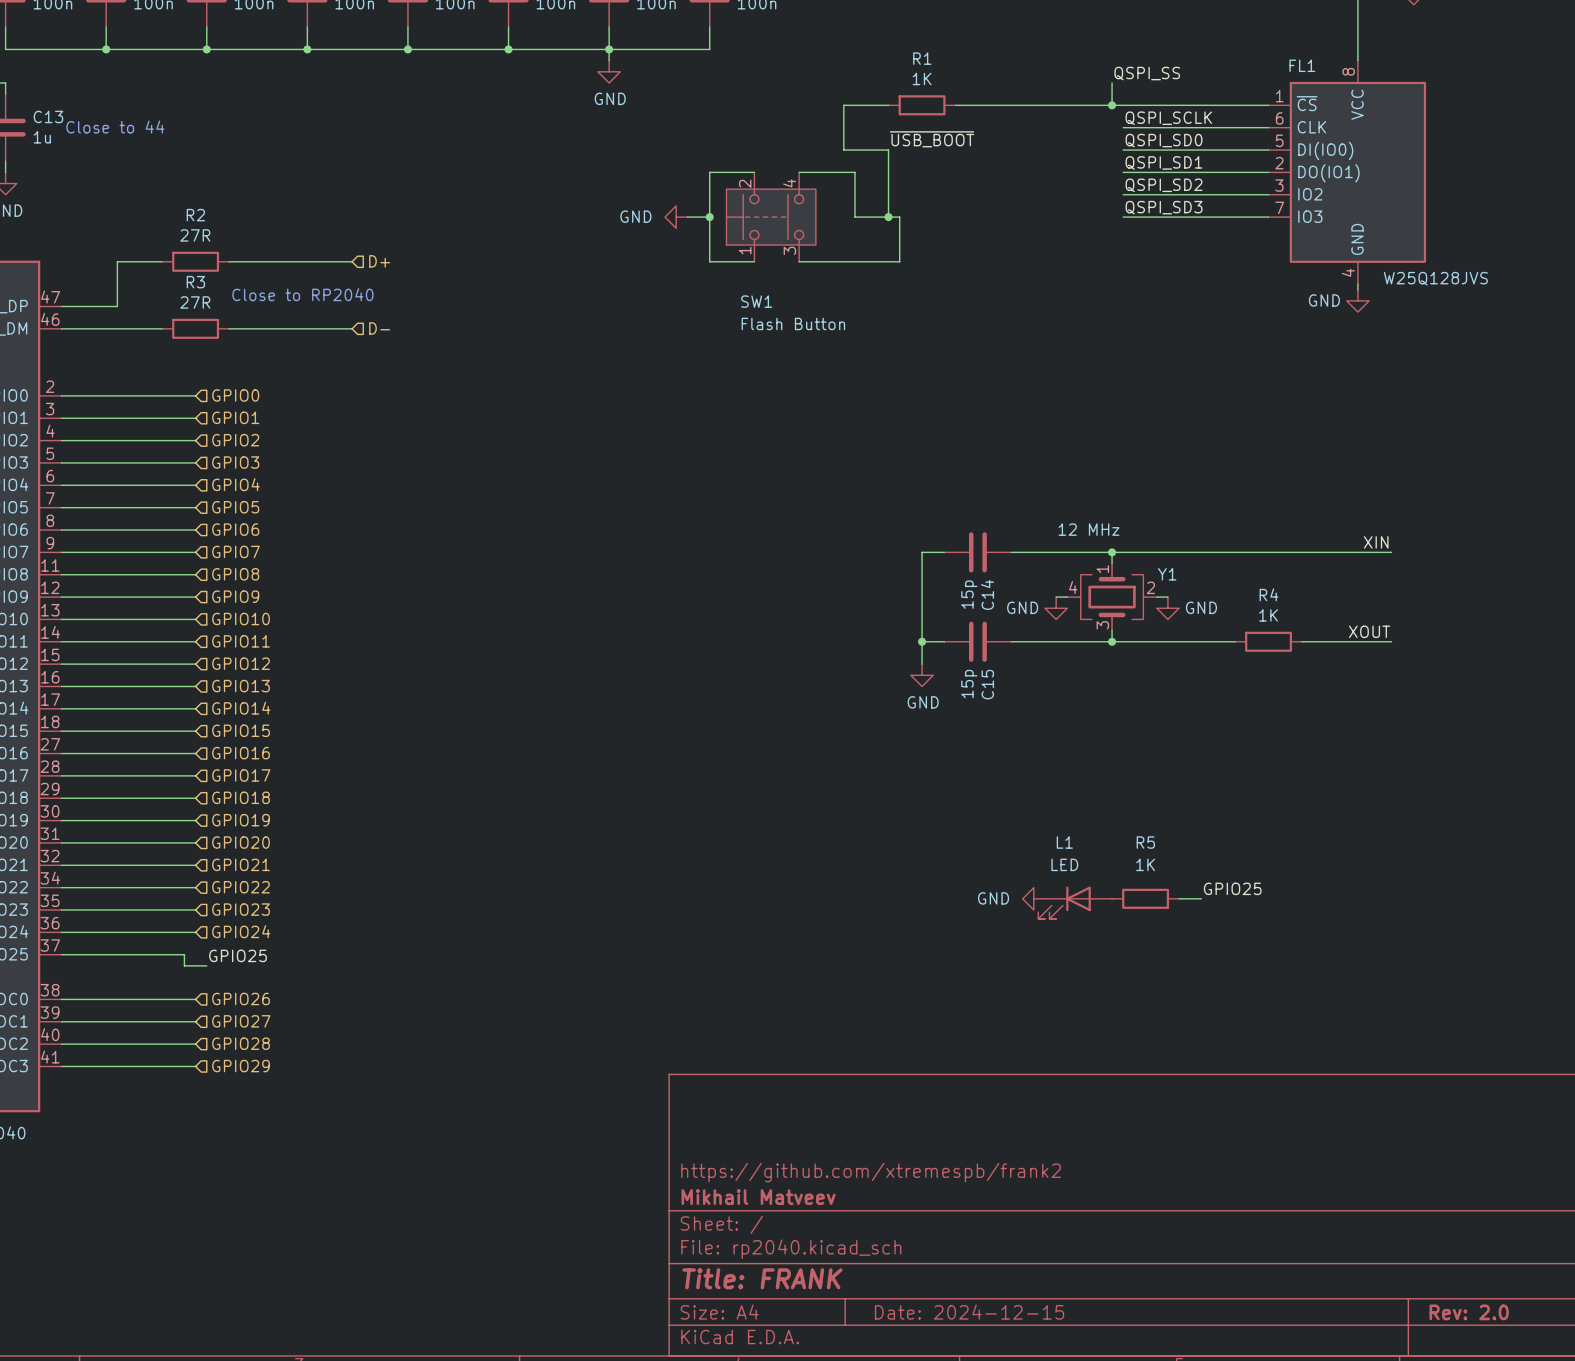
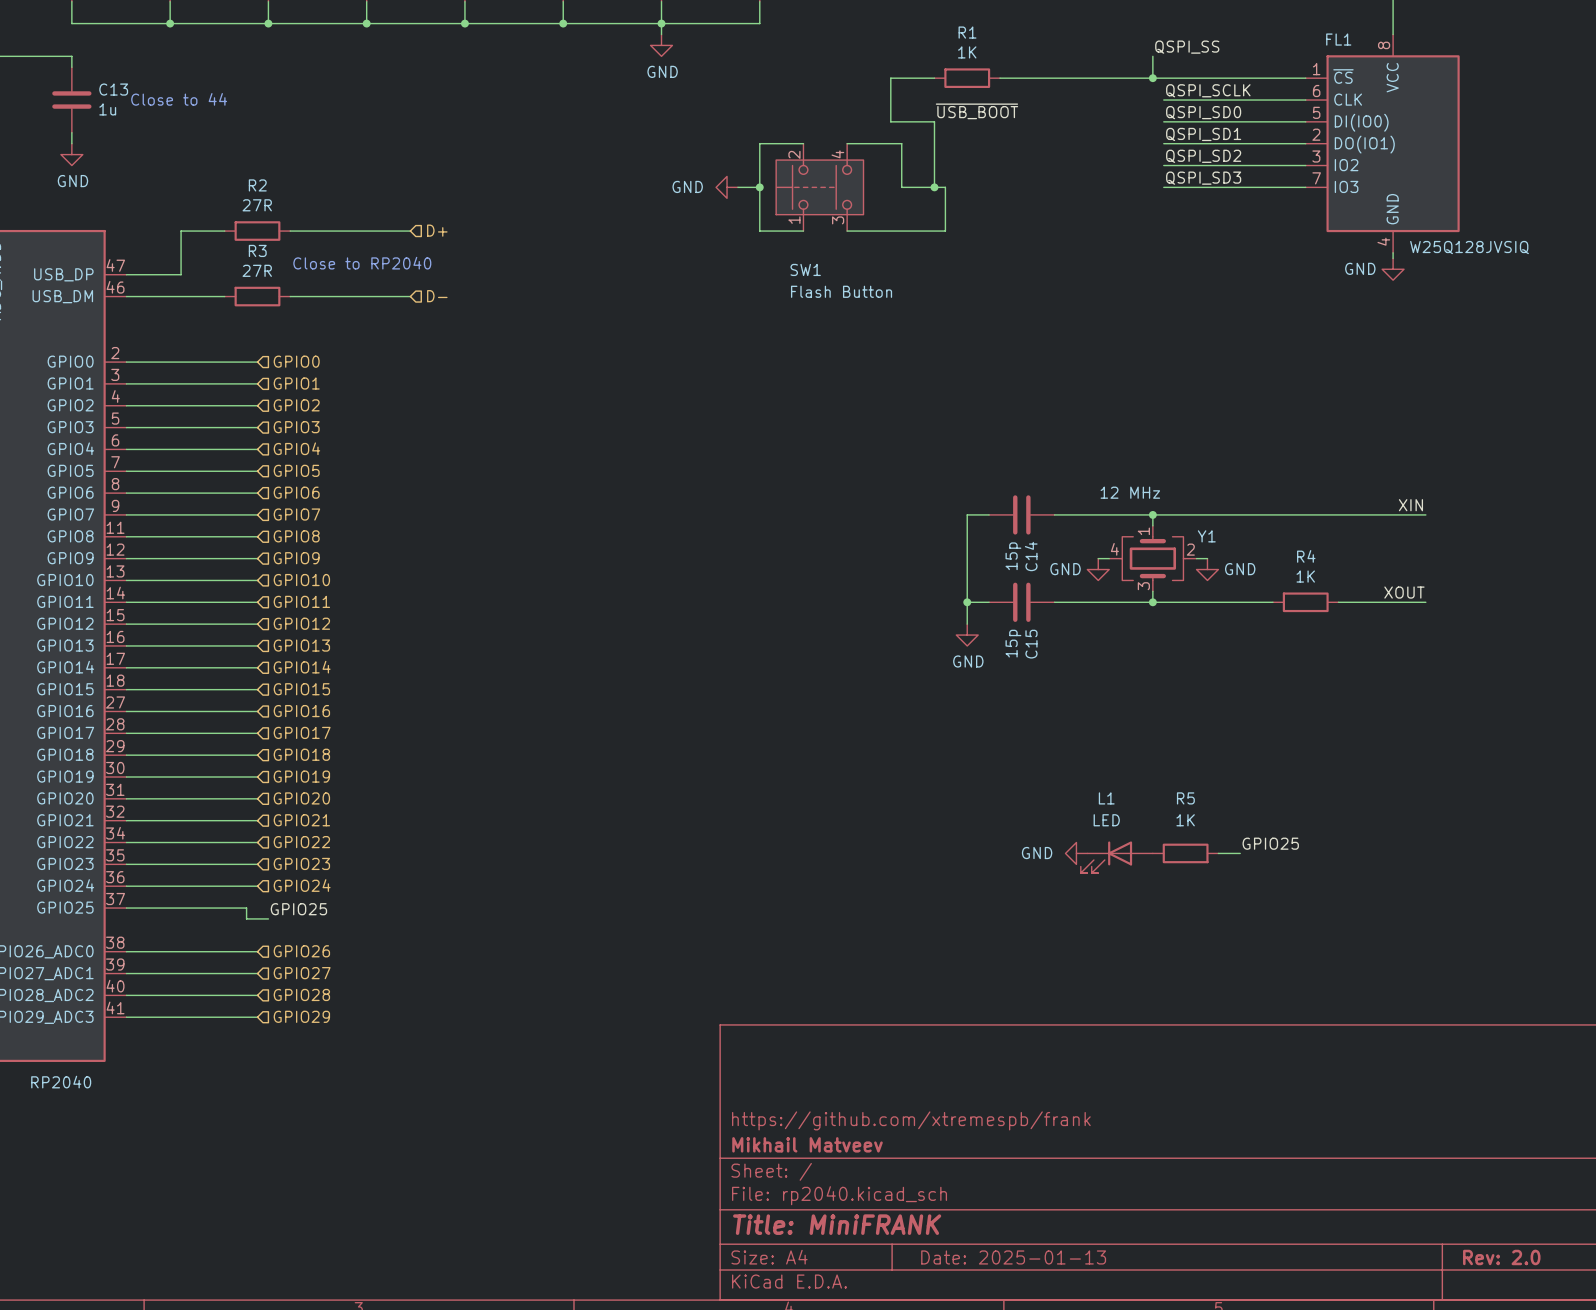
FL1 value: W25Q128JVS (1435, 278) -> W25Q128JVSIQ (1469, 247)
title block: https://github.com/xtremespb/frank2 (871, 1172) -> https://github.com/xtremespb/frank (911, 1120)
title block: Title: FRANK (762, 1278) -> Title: MiniFRANK (837, 1224)
title block: Date: 2024-12-15 (969, 1312) -> Date: 2025-01-13 (1013, 1257)

